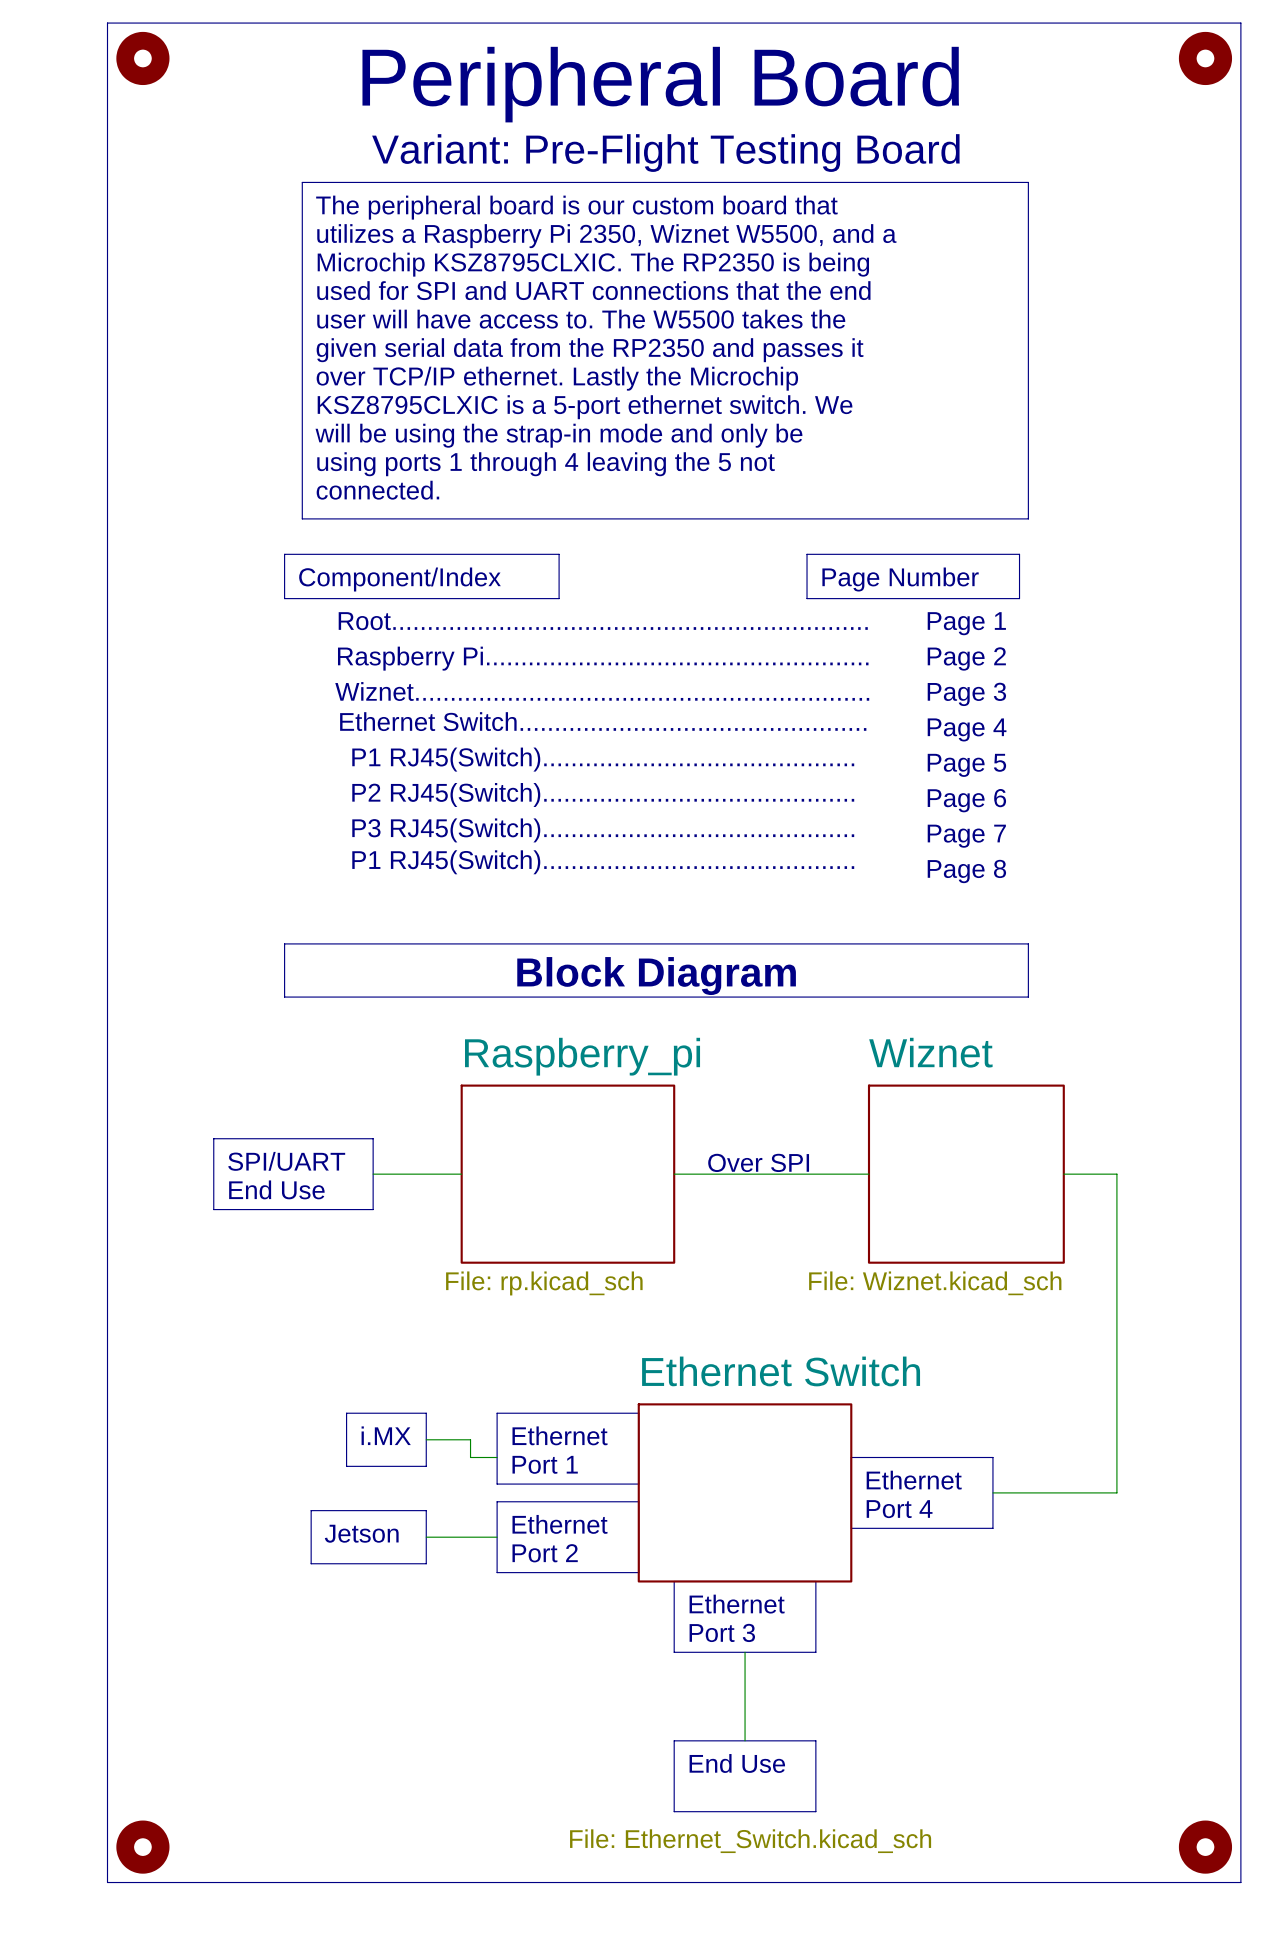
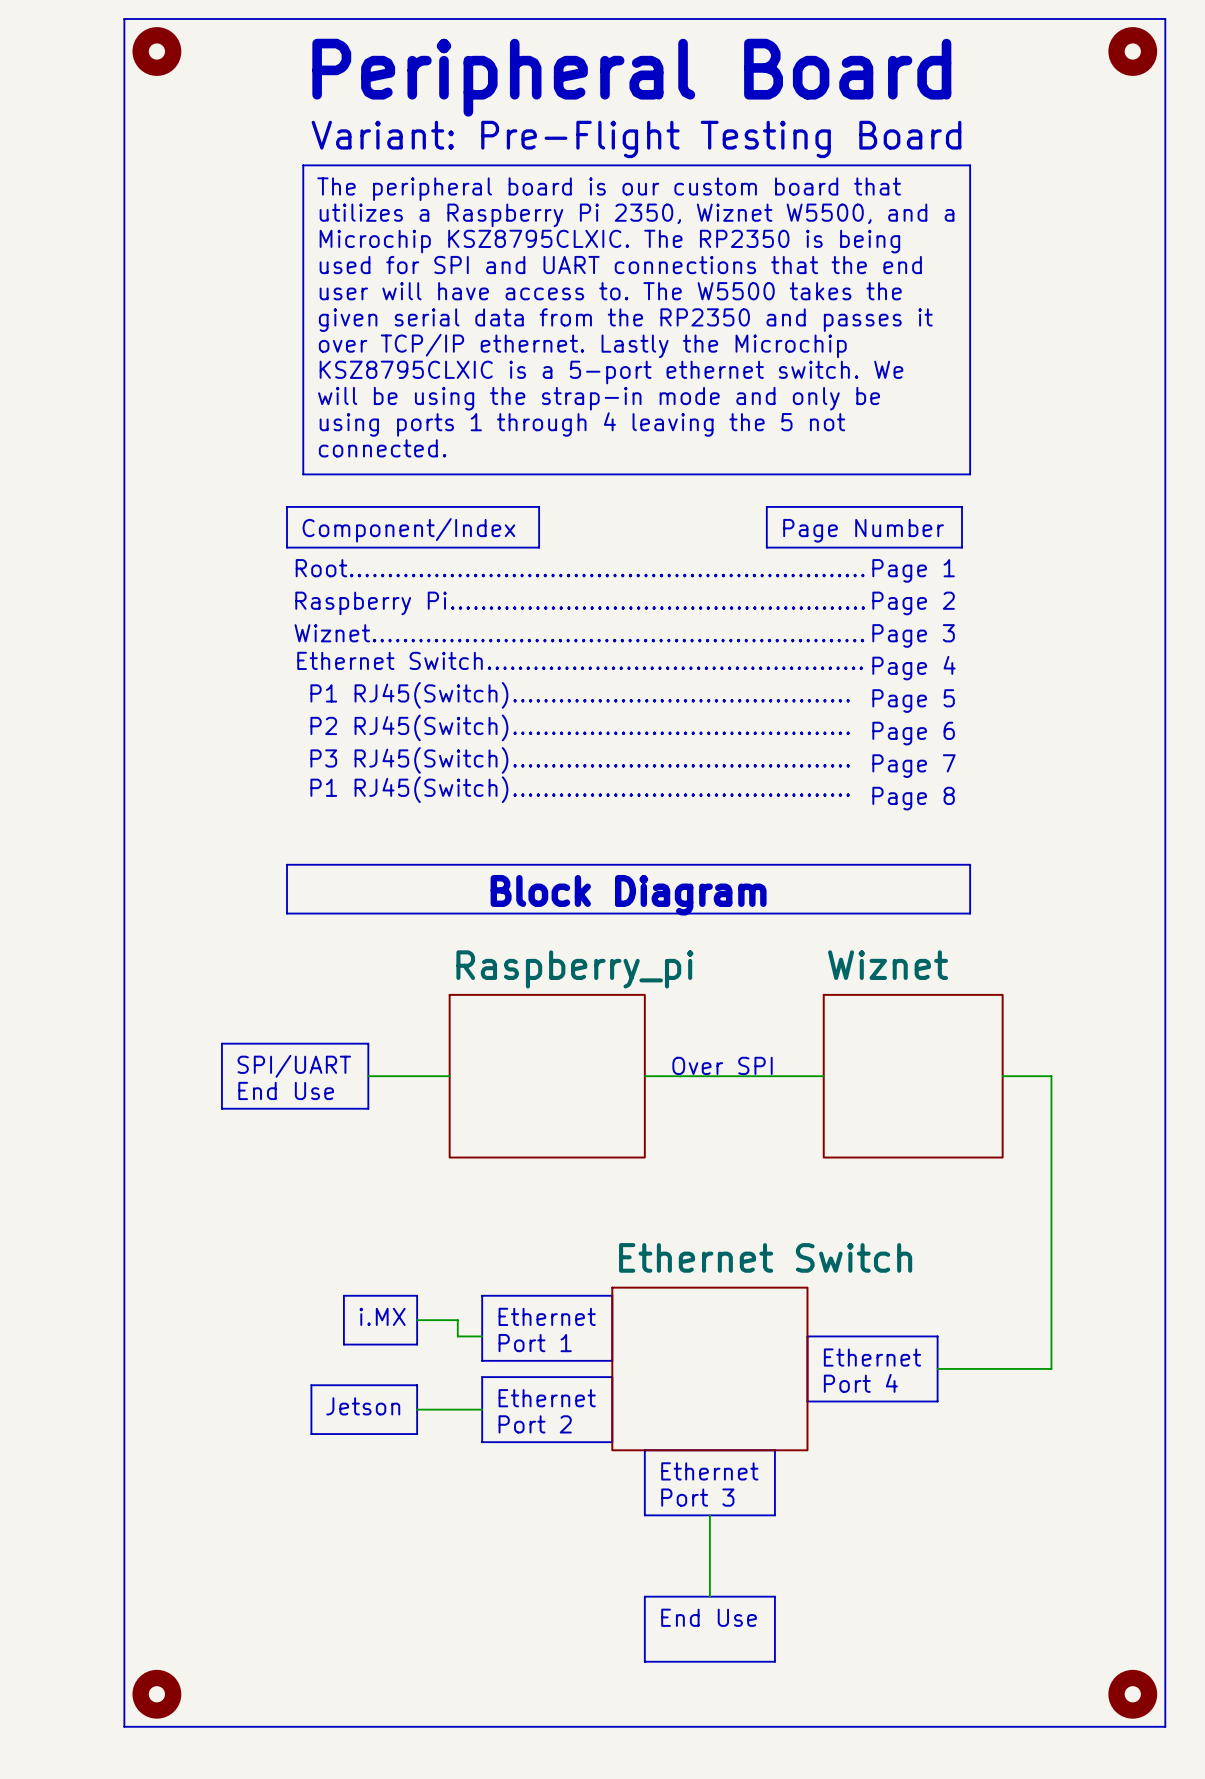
sheet Raspberry_pi value: File: rp.kicad_sch (544, 1283) -> none
sheet Wiznet value: File: Wiznet.kicad_sch (935, 1283) -> none
sheet Ethernet Switch value: File: Ethernet_Switch.kicad_sch (750, 1841) -> none

